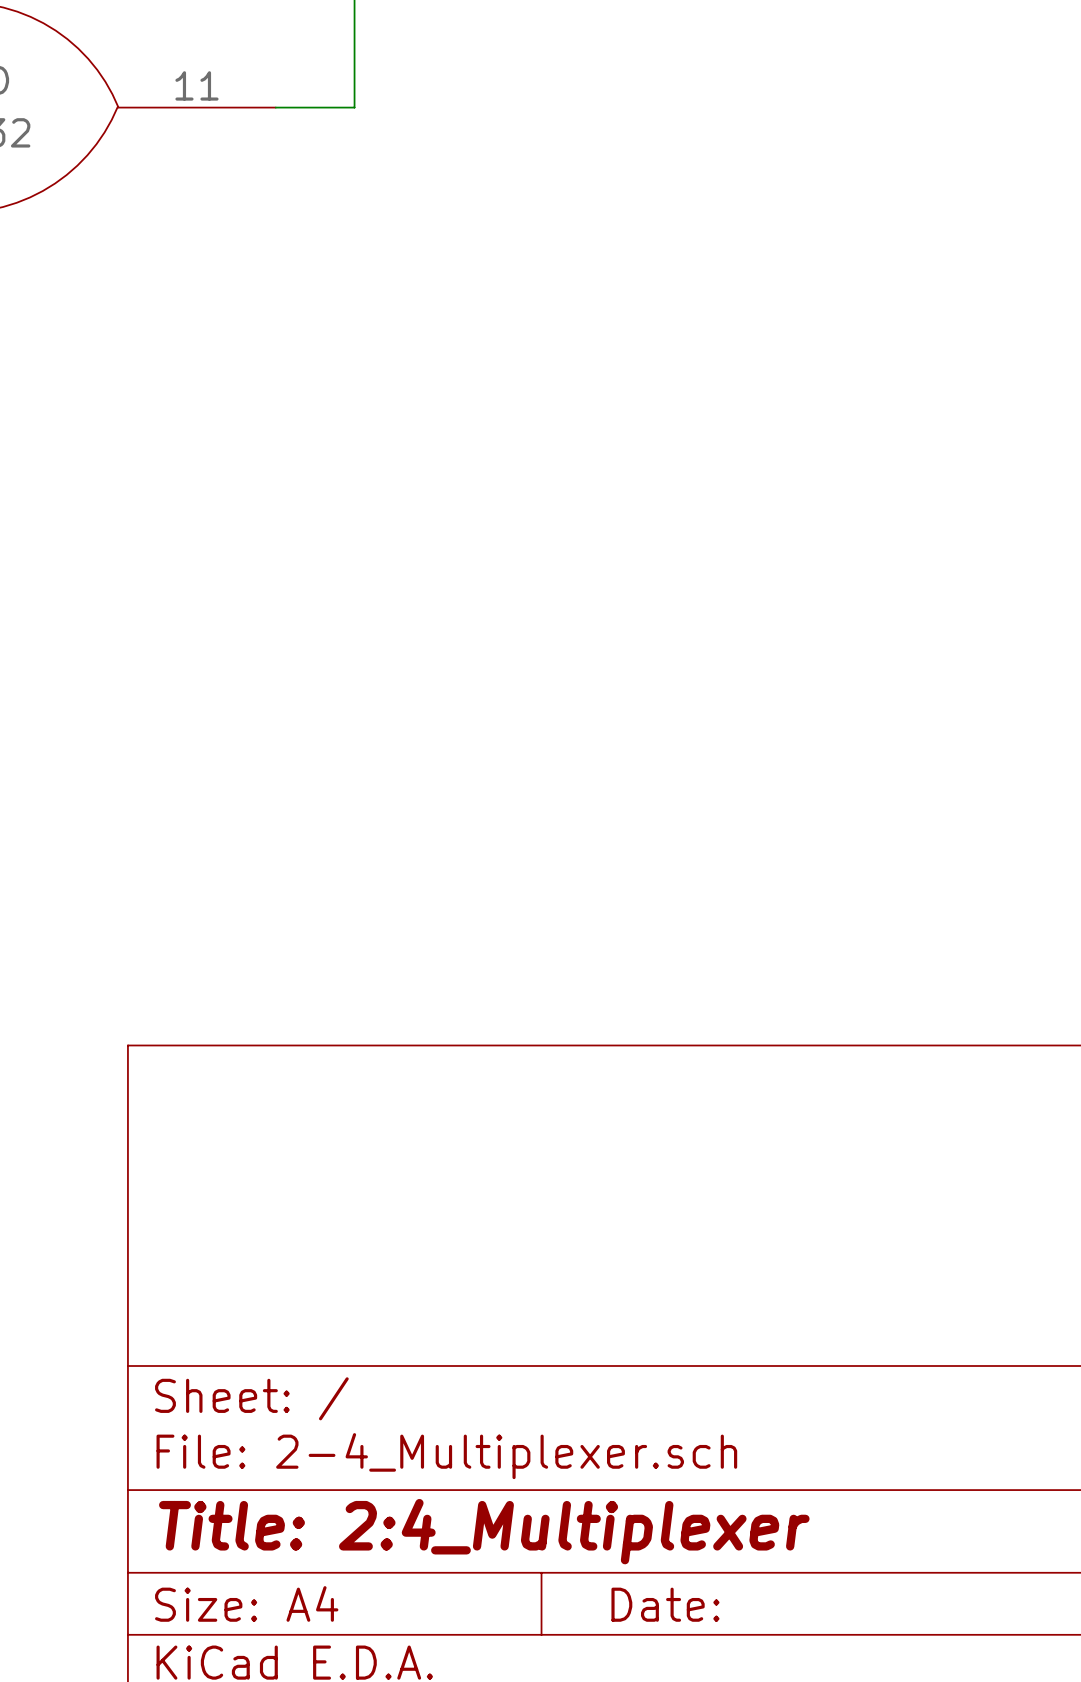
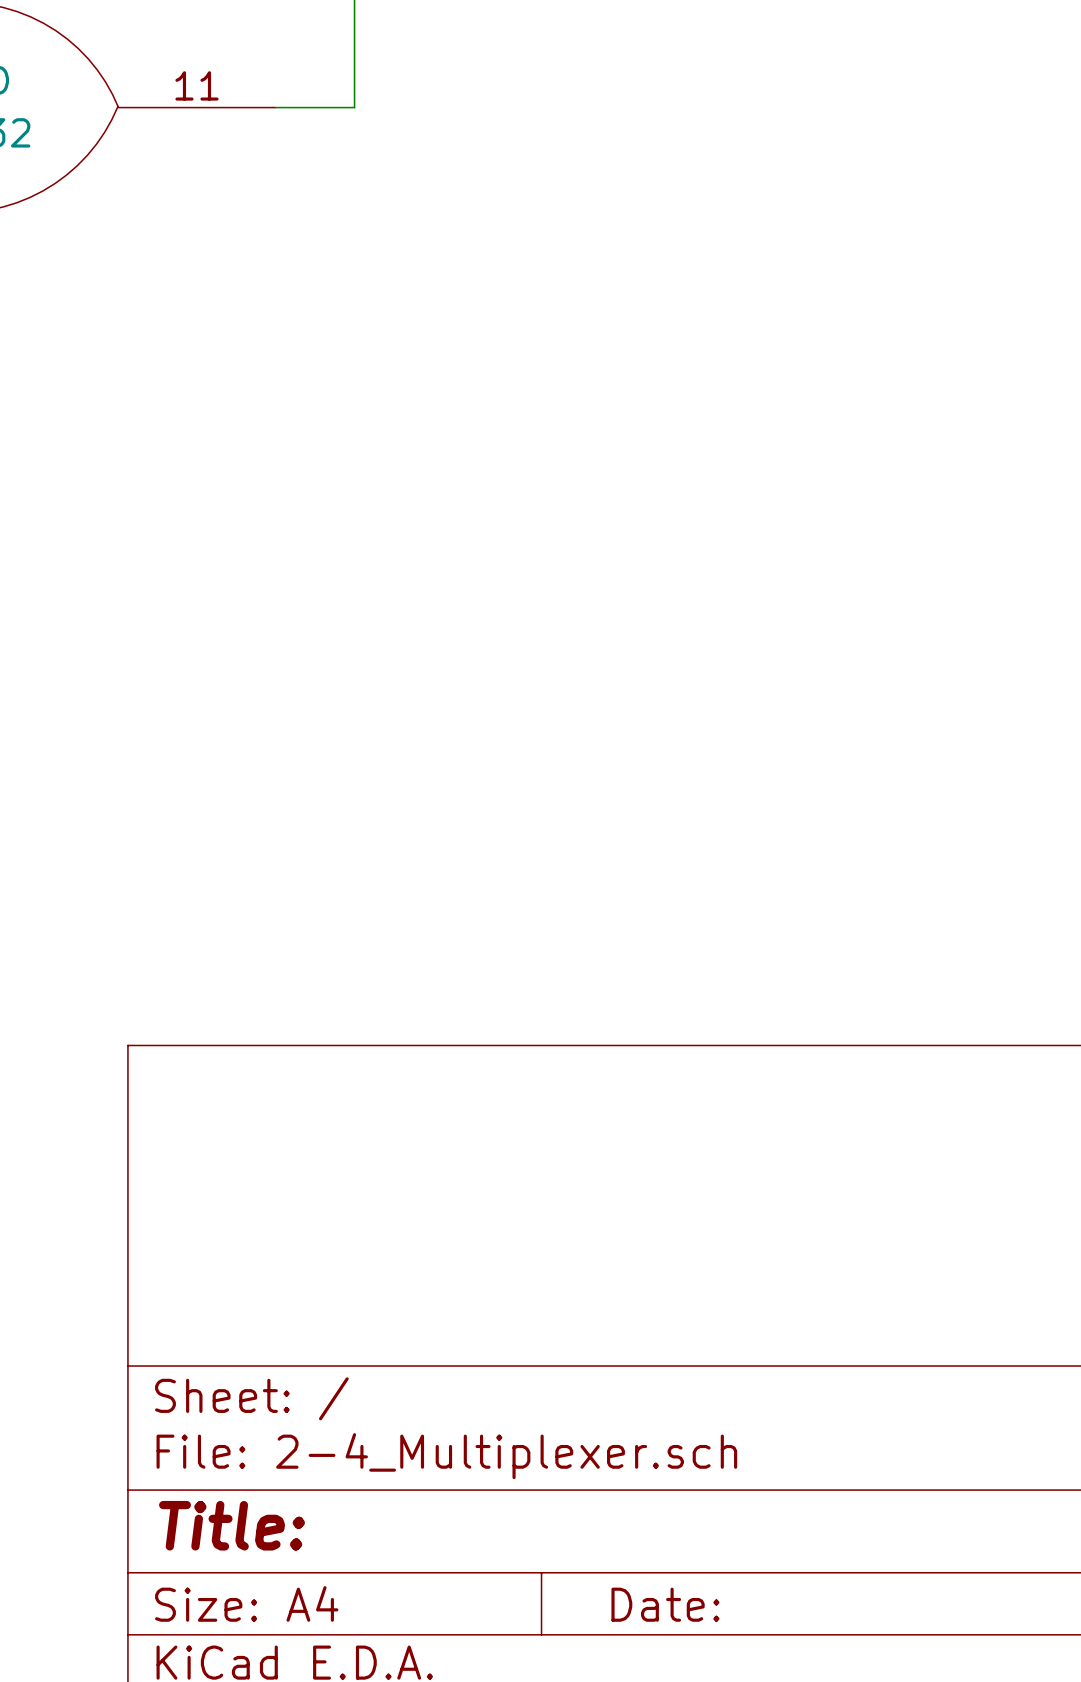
title block: Title: 2:4_Multiplexer (484, 1531) -> Title: (231, 1525)

